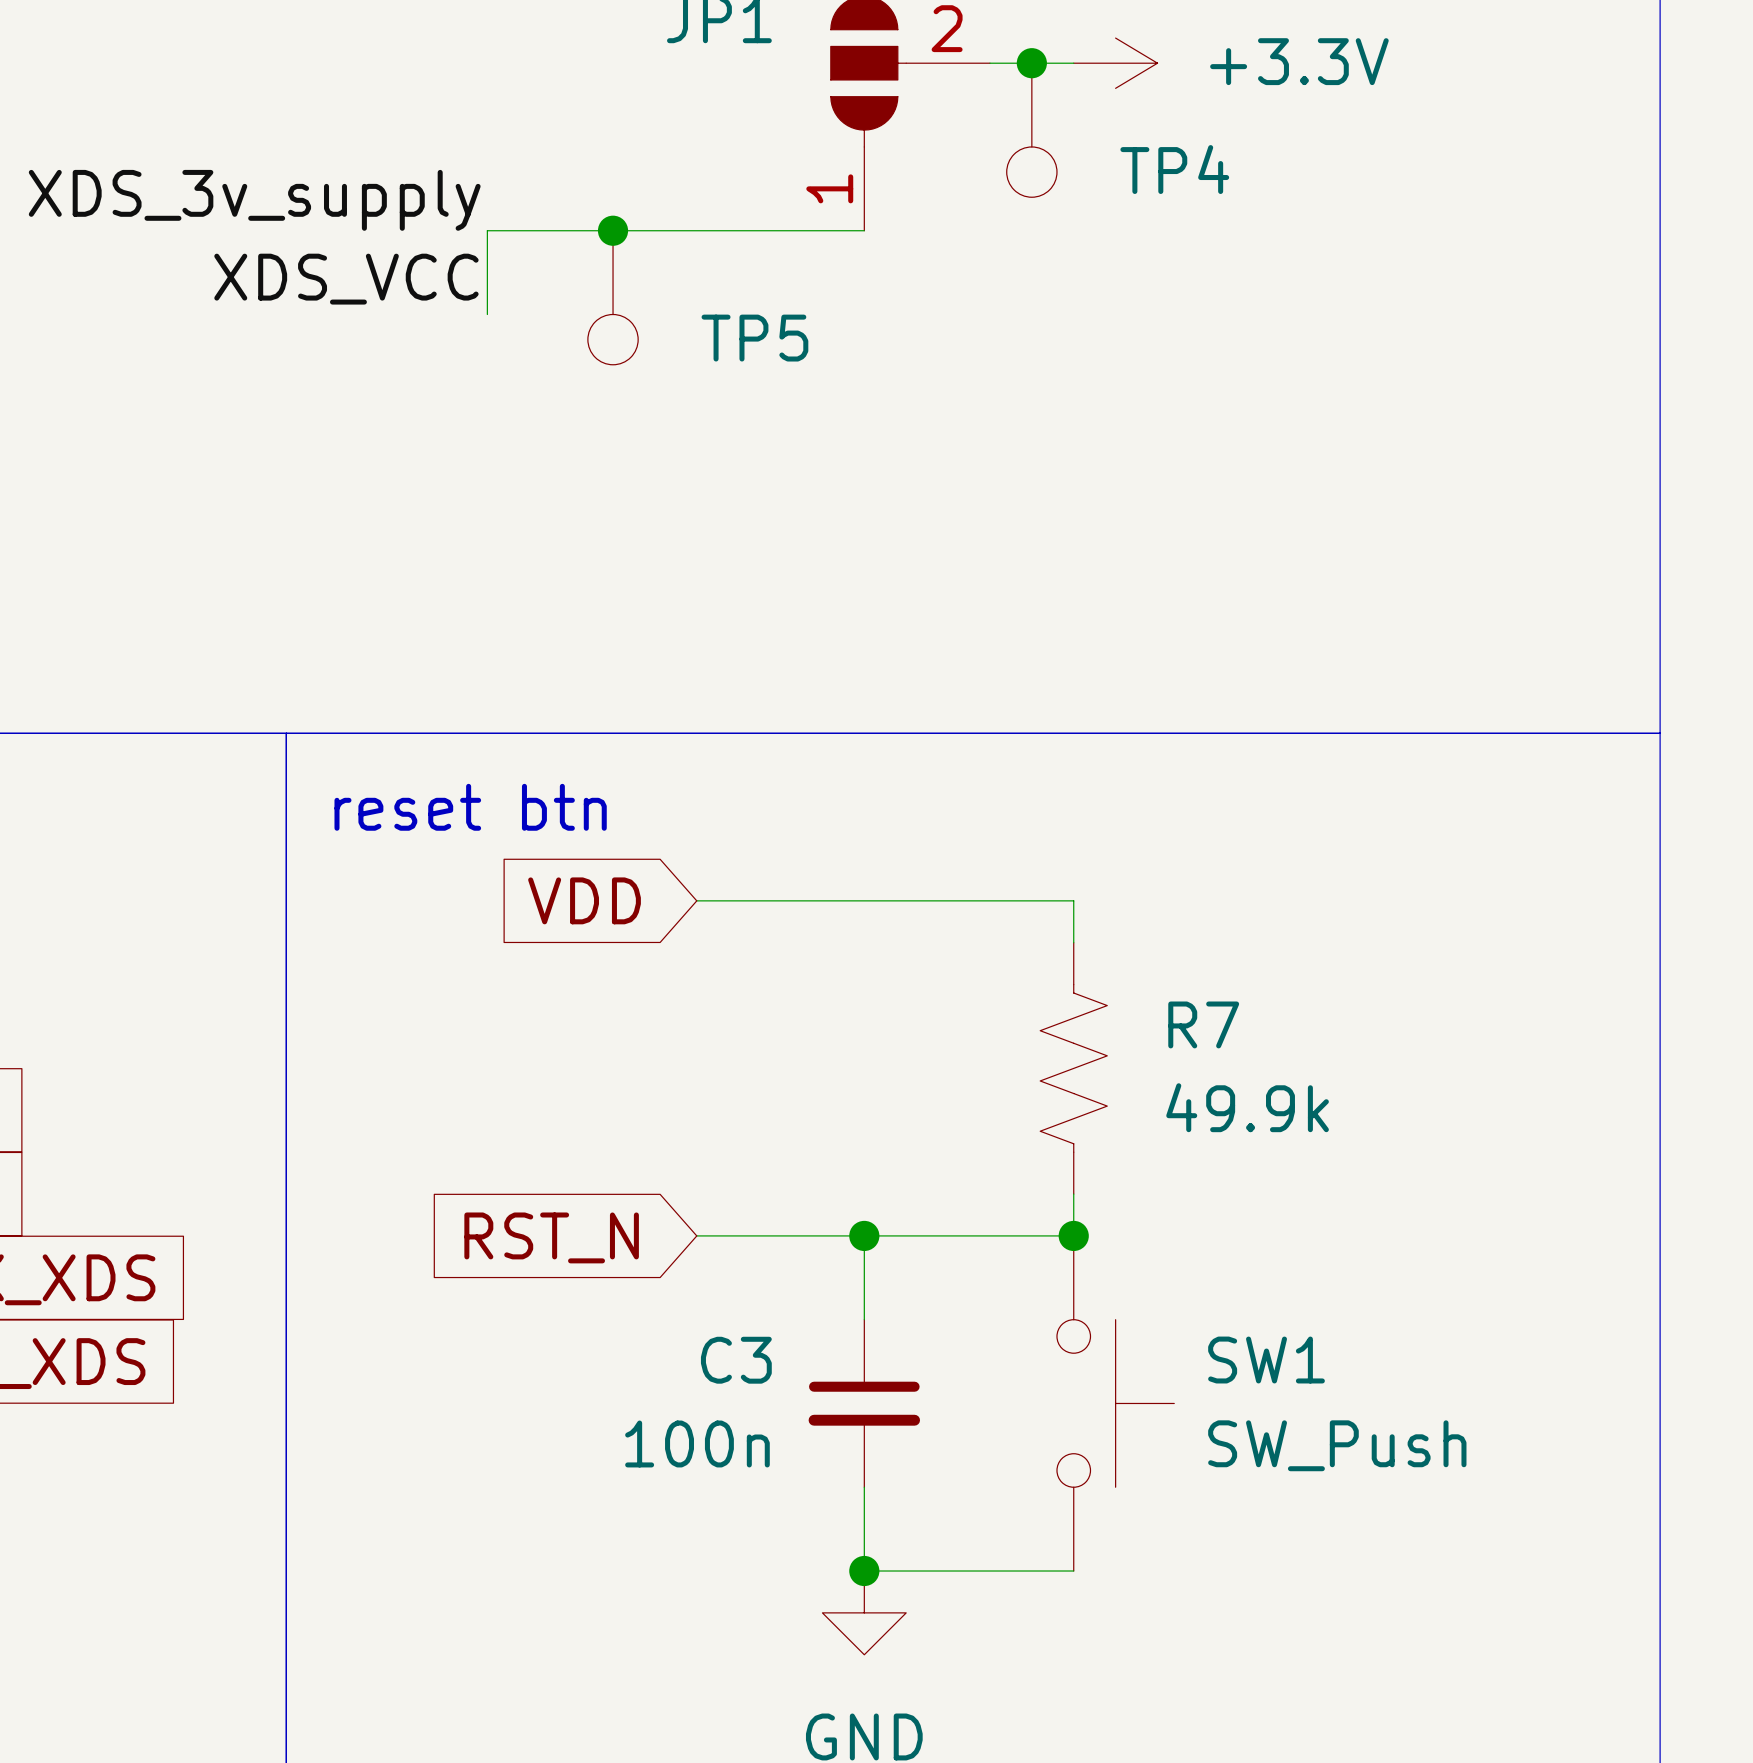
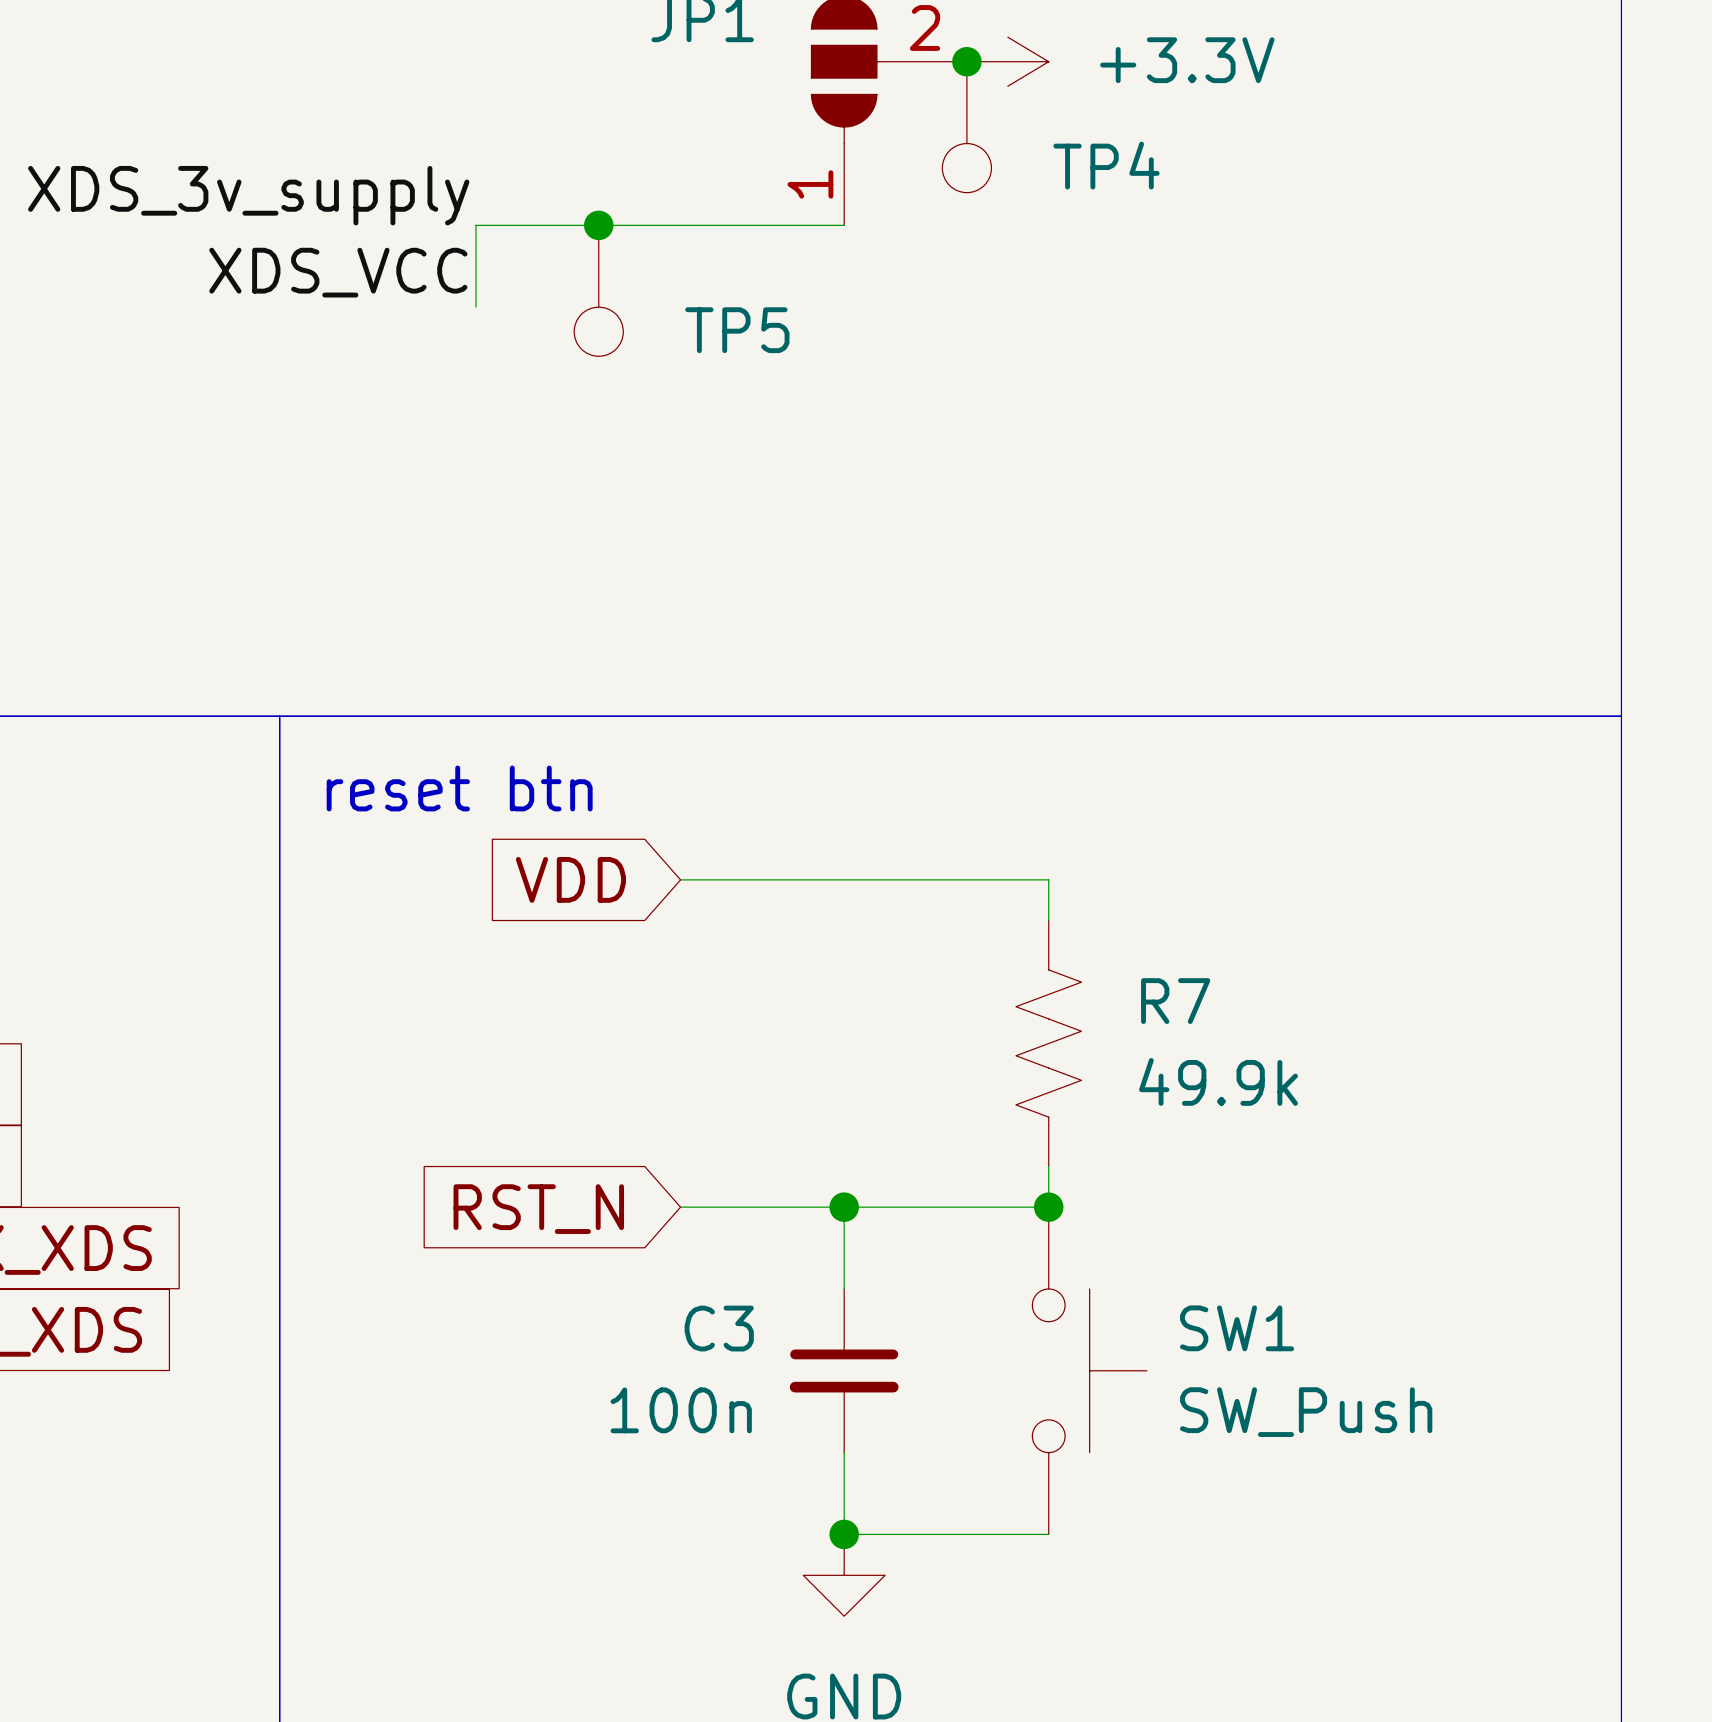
junction position: (1031, 63) -> (966, 61)
power symbol position: +3.3V (1115, 63) -> +3.3V (1007, 61)
TP4 position: (1031, 130) -> (966, 127)

